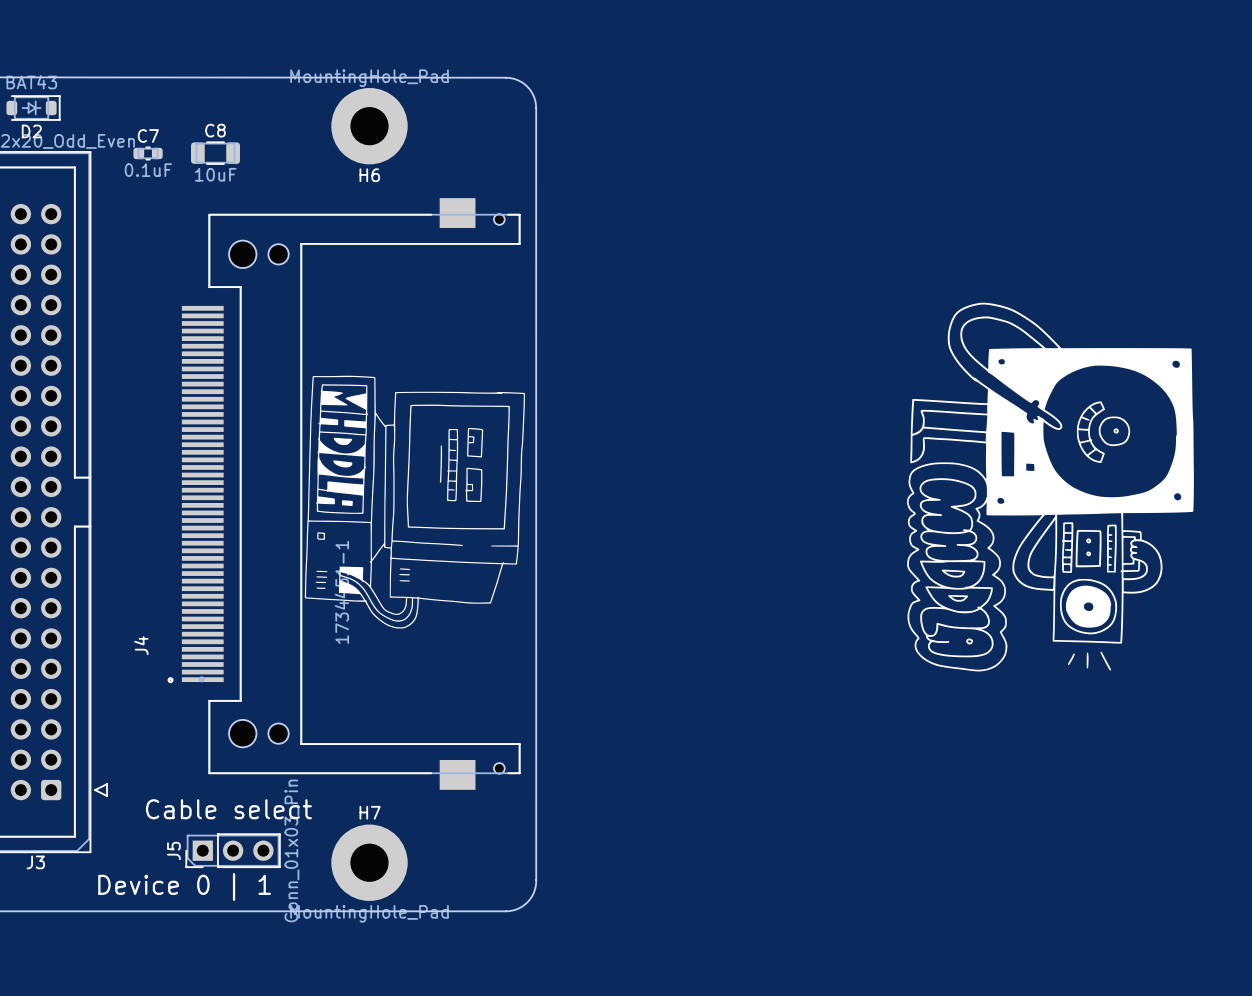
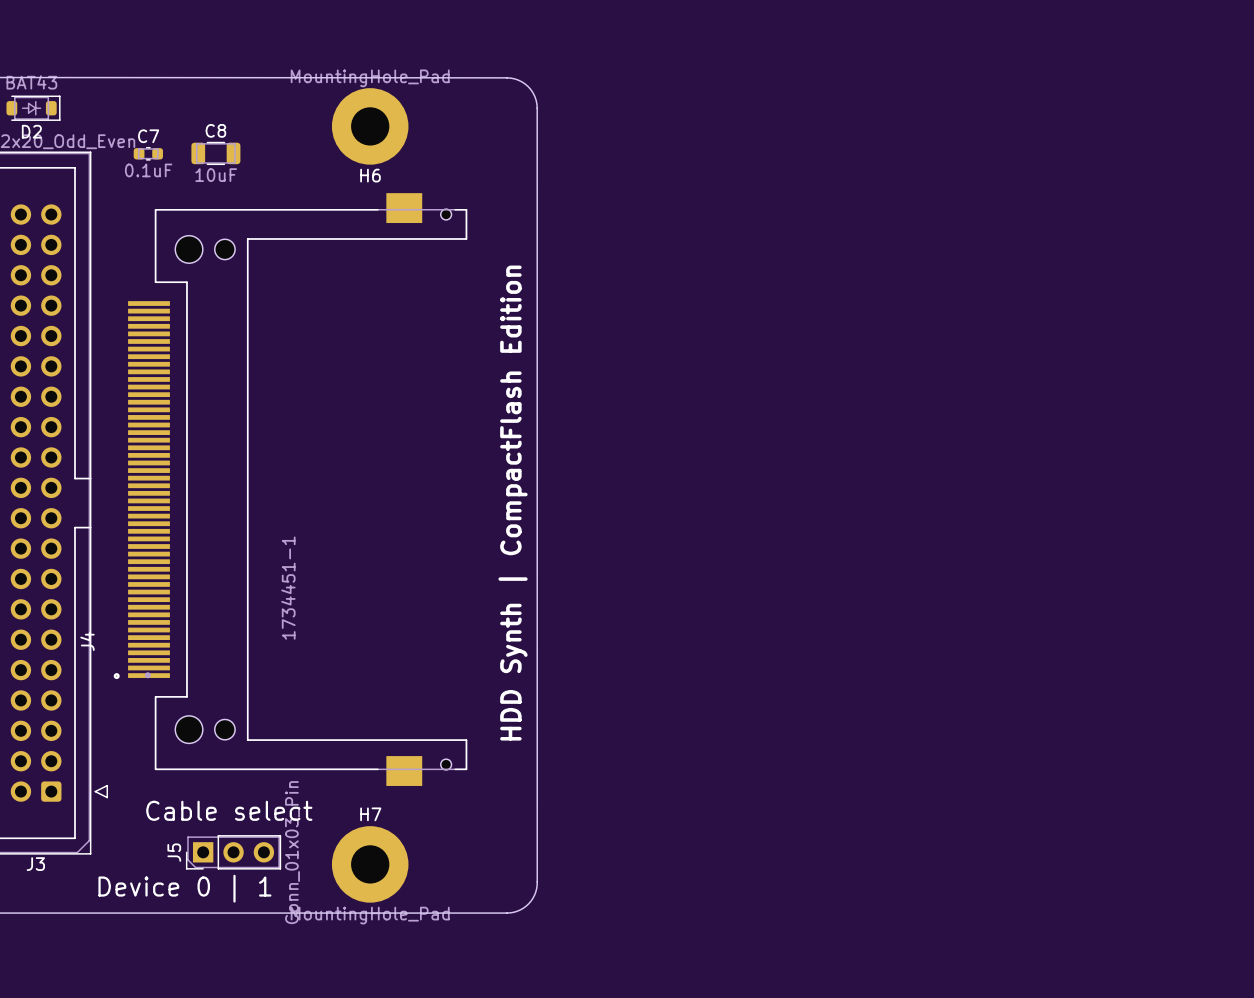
drawing: [906, 302, 1194, 672] -> none
drawing: [304, 375, 525, 629] -> none
J4 position: (343, 493) -> (290, 489)
text: none -> HDD Synth | CompactFlash Edition (513, 503)

